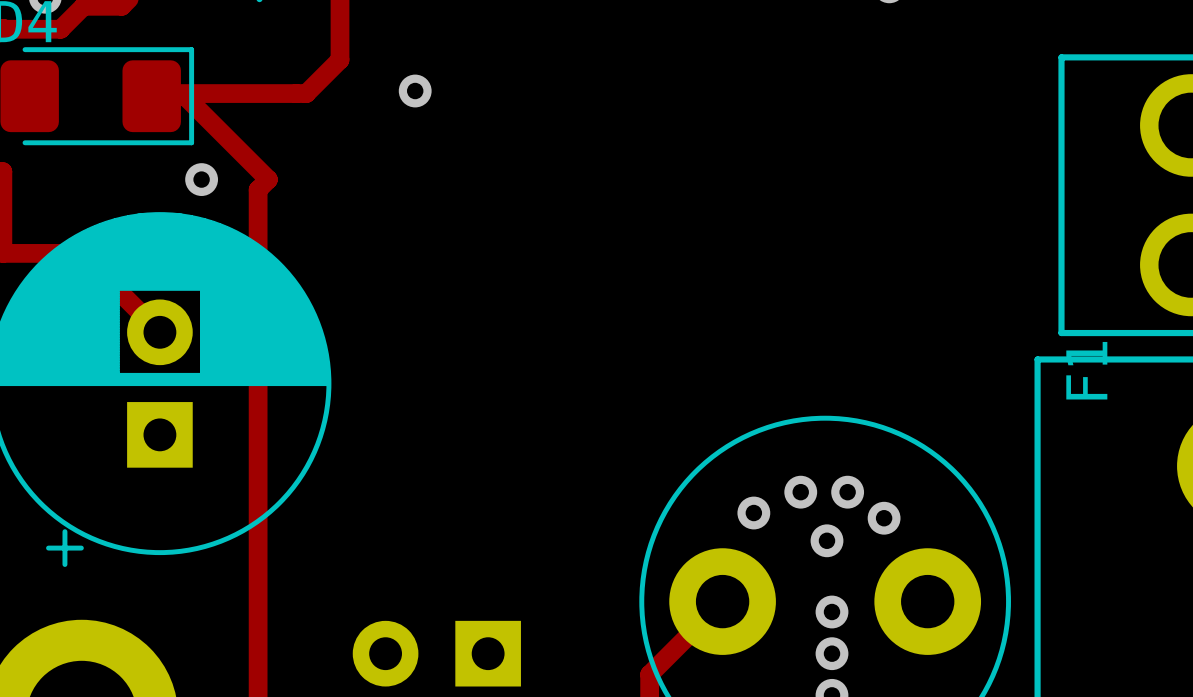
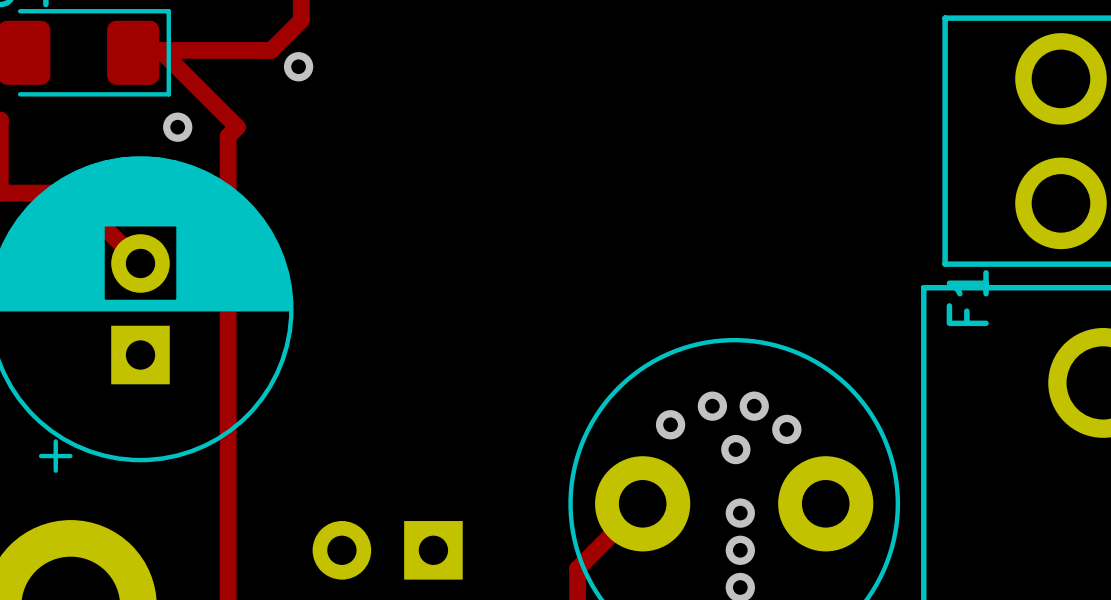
via position: (415, 91) -> (298, 66)

